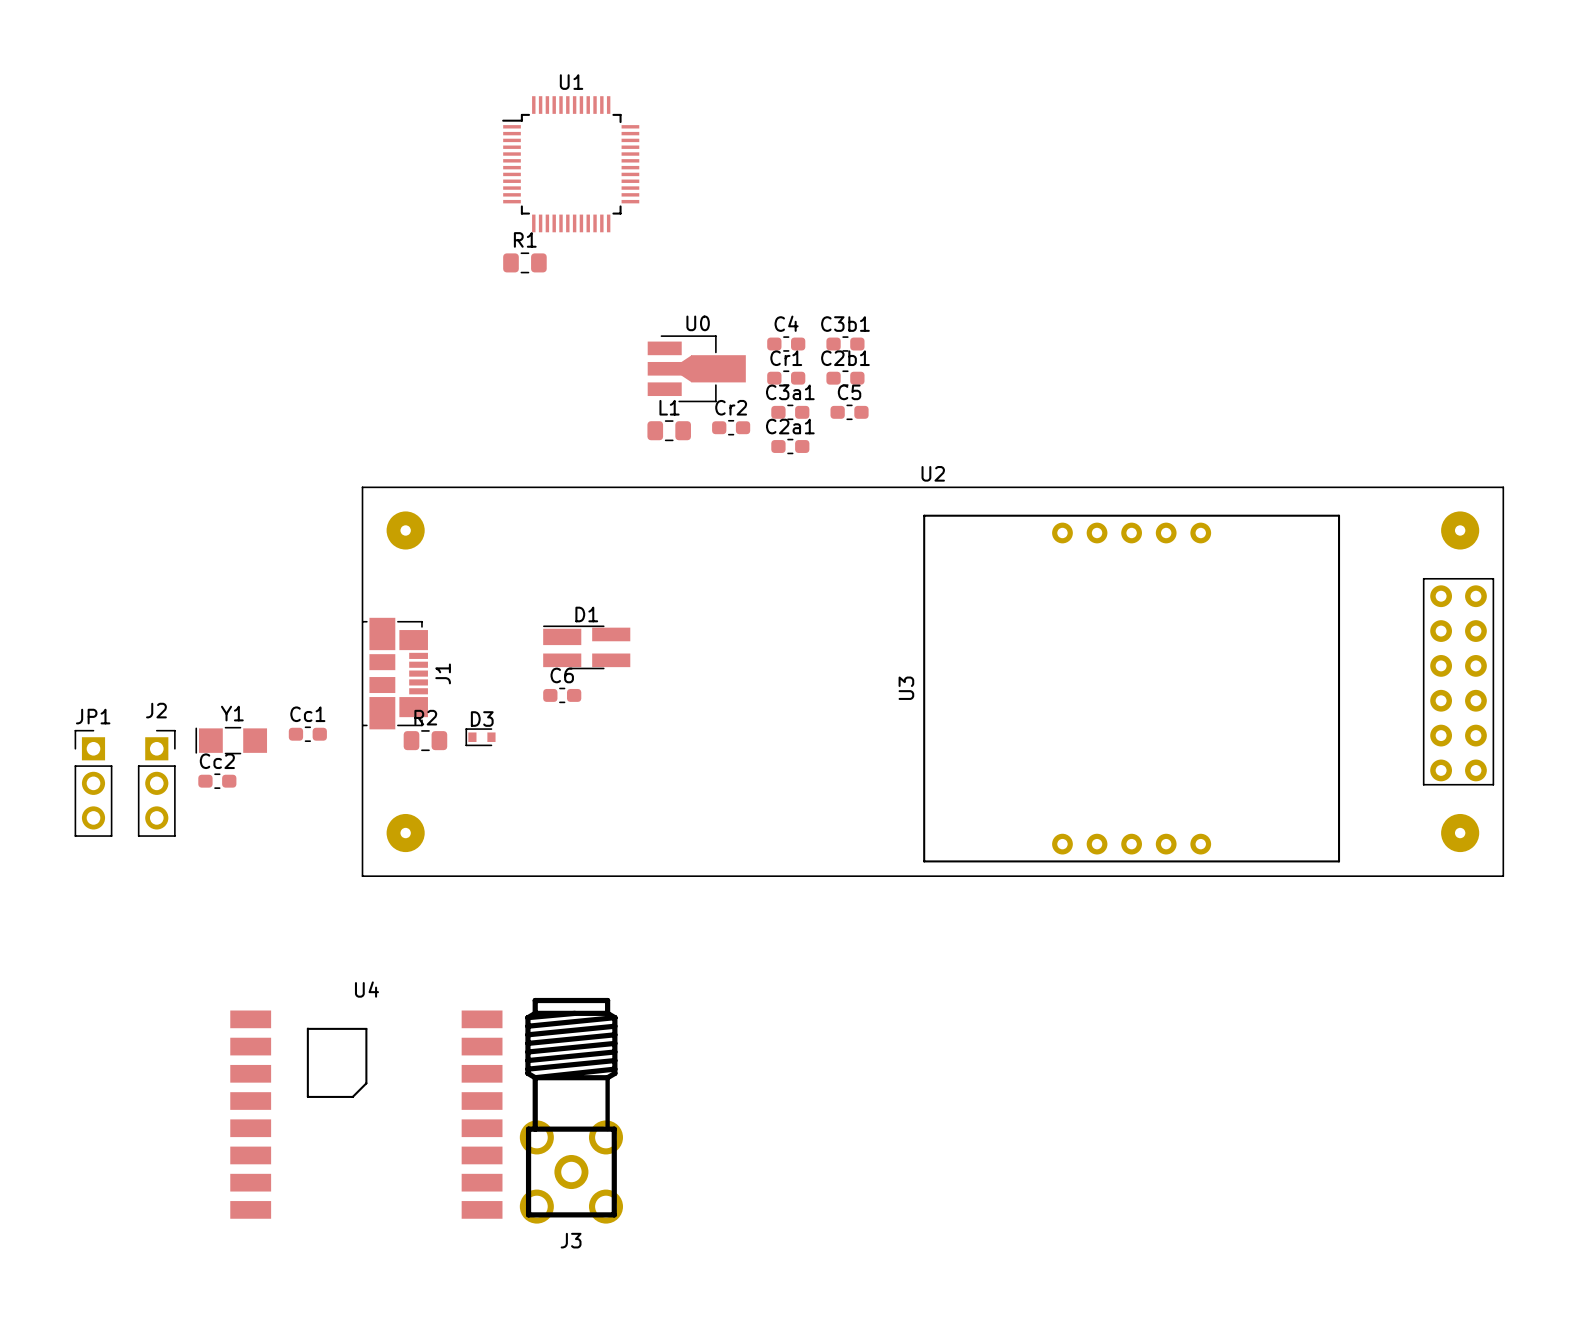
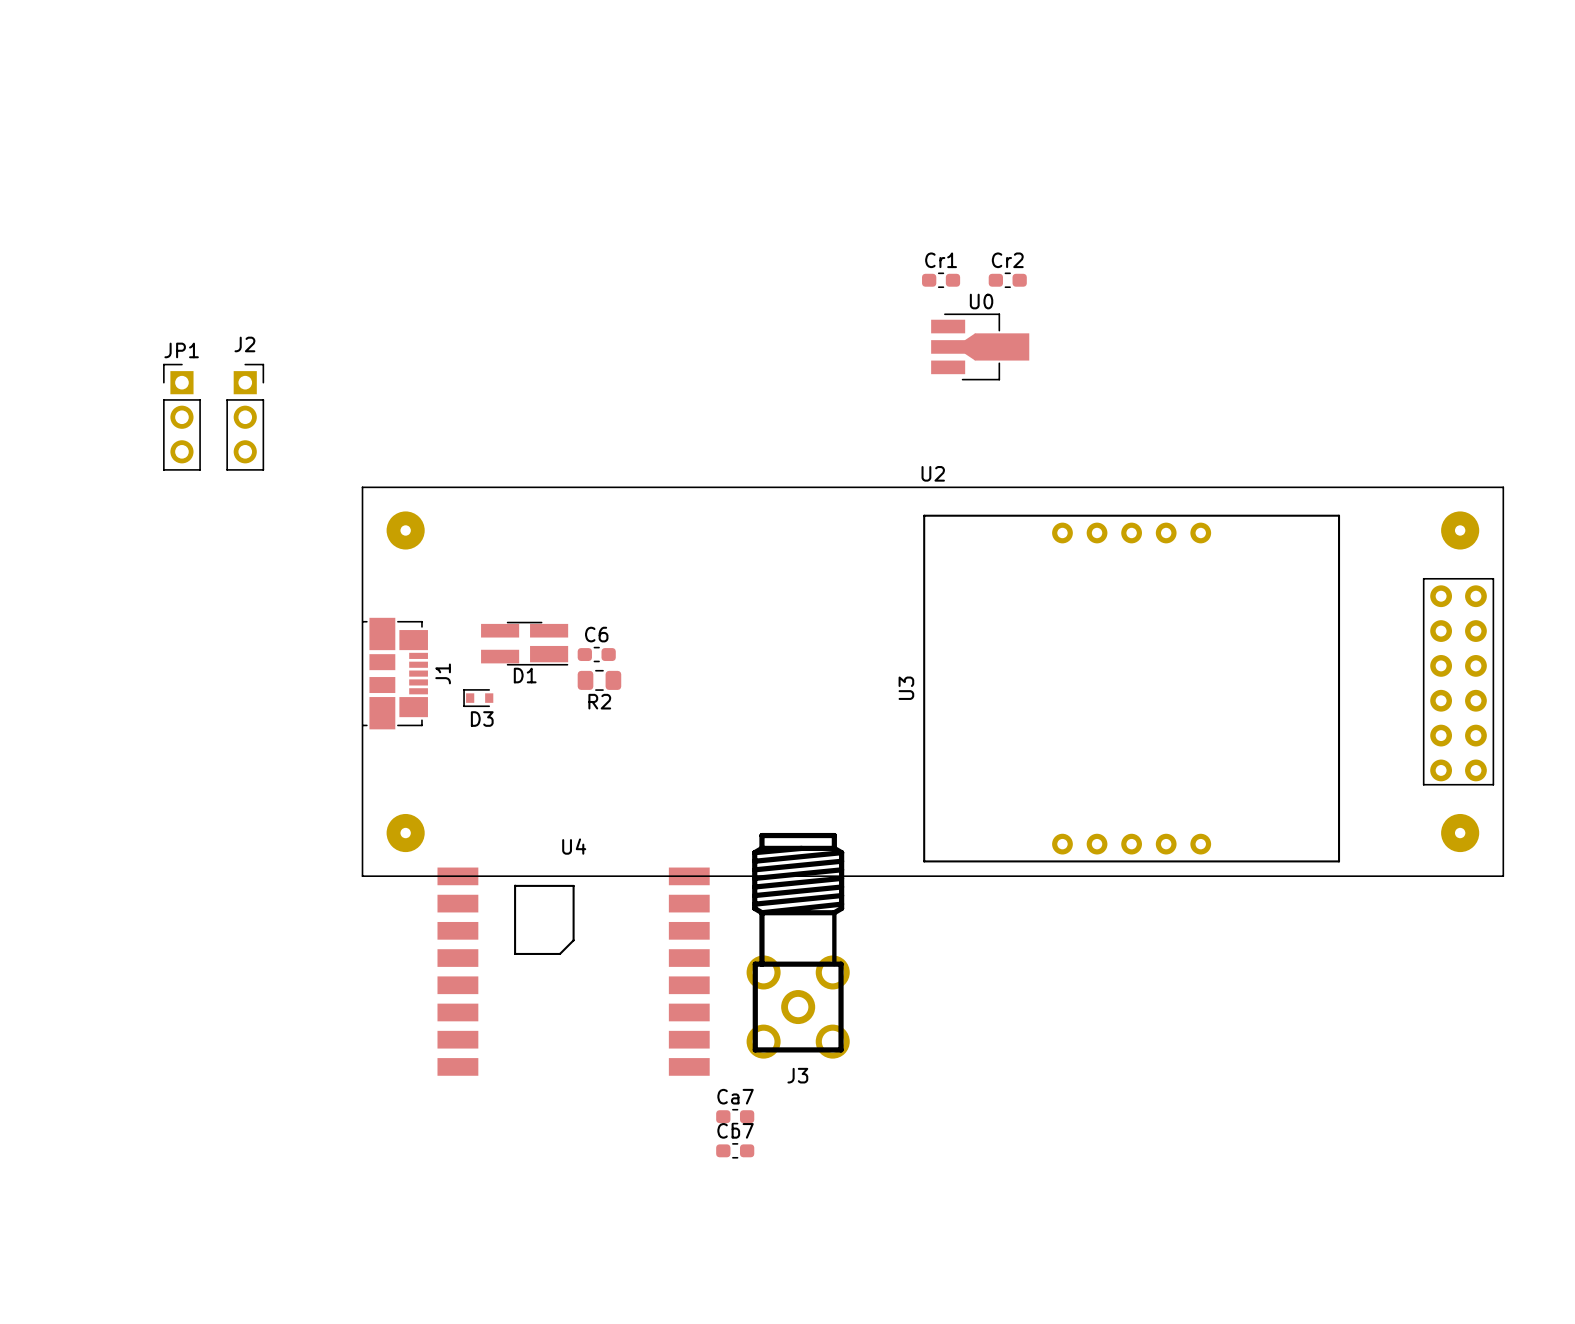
U1: (570, 164) -> none
R1: (524, 262) -> none
C4: (786, 344) -> none
C3b1: (845, 344) -> none
U0 position: (696, 368) -> (980, 346)
Cr1 position: (786, 378) -> (941, 280)
C2b1: (845, 378) -> none
C3a1: (790, 412) -> none
C5: (849, 412) -> none
Cr2 position: (731, 427) -> (1007, 280)
L1: (669, 430) -> none
C2a1: (790, 446) -> none
D1 rotation: 0° (586, 647) -> 180° (524, 643)
D1 position: (586, 647) -> (524, 643)
C6 position: (562, 695) -> (596, 654)
R2 name position: R2 (425, 717) -> R2 (599, 701)
Cc1: (307, 734) -> none
D3 position: (480, 737) -> (478, 698)
Y1: (231, 740) -> none
R2 position: (425, 740) -> (599, 680)
Cc2: (217, 781) -> none
JP1 position: (93, 783) -> (181, 417)
J2 position: (156, 783) -> (245, 417)
J3 position: (571, 1110) -> (798, 945)
U4 position: (366, 1114) -> (573, 971)
Ca7: none -> (735, 1116)
Cb7: none -> (735, 1150)

